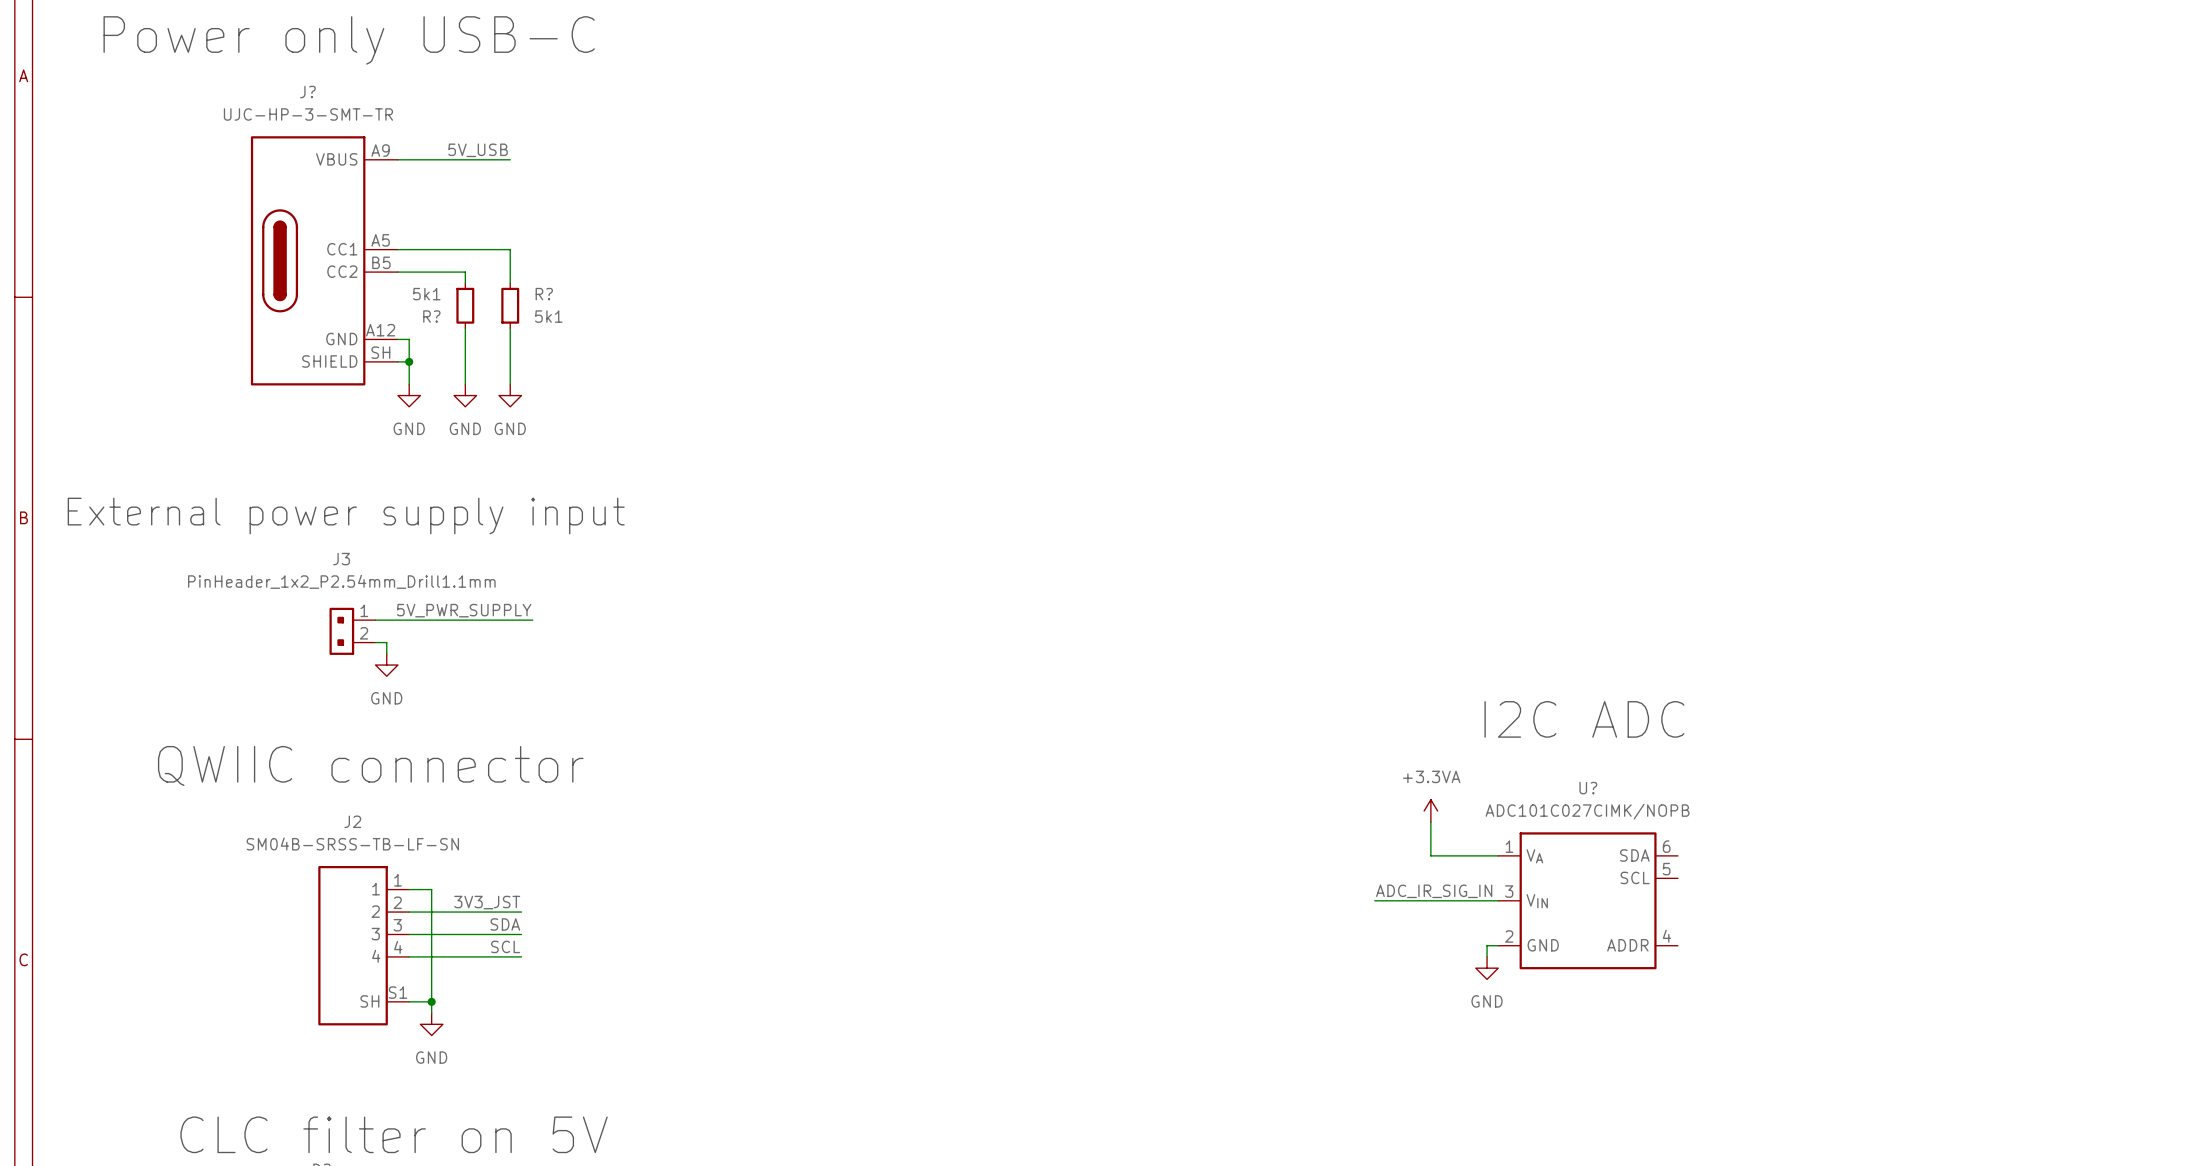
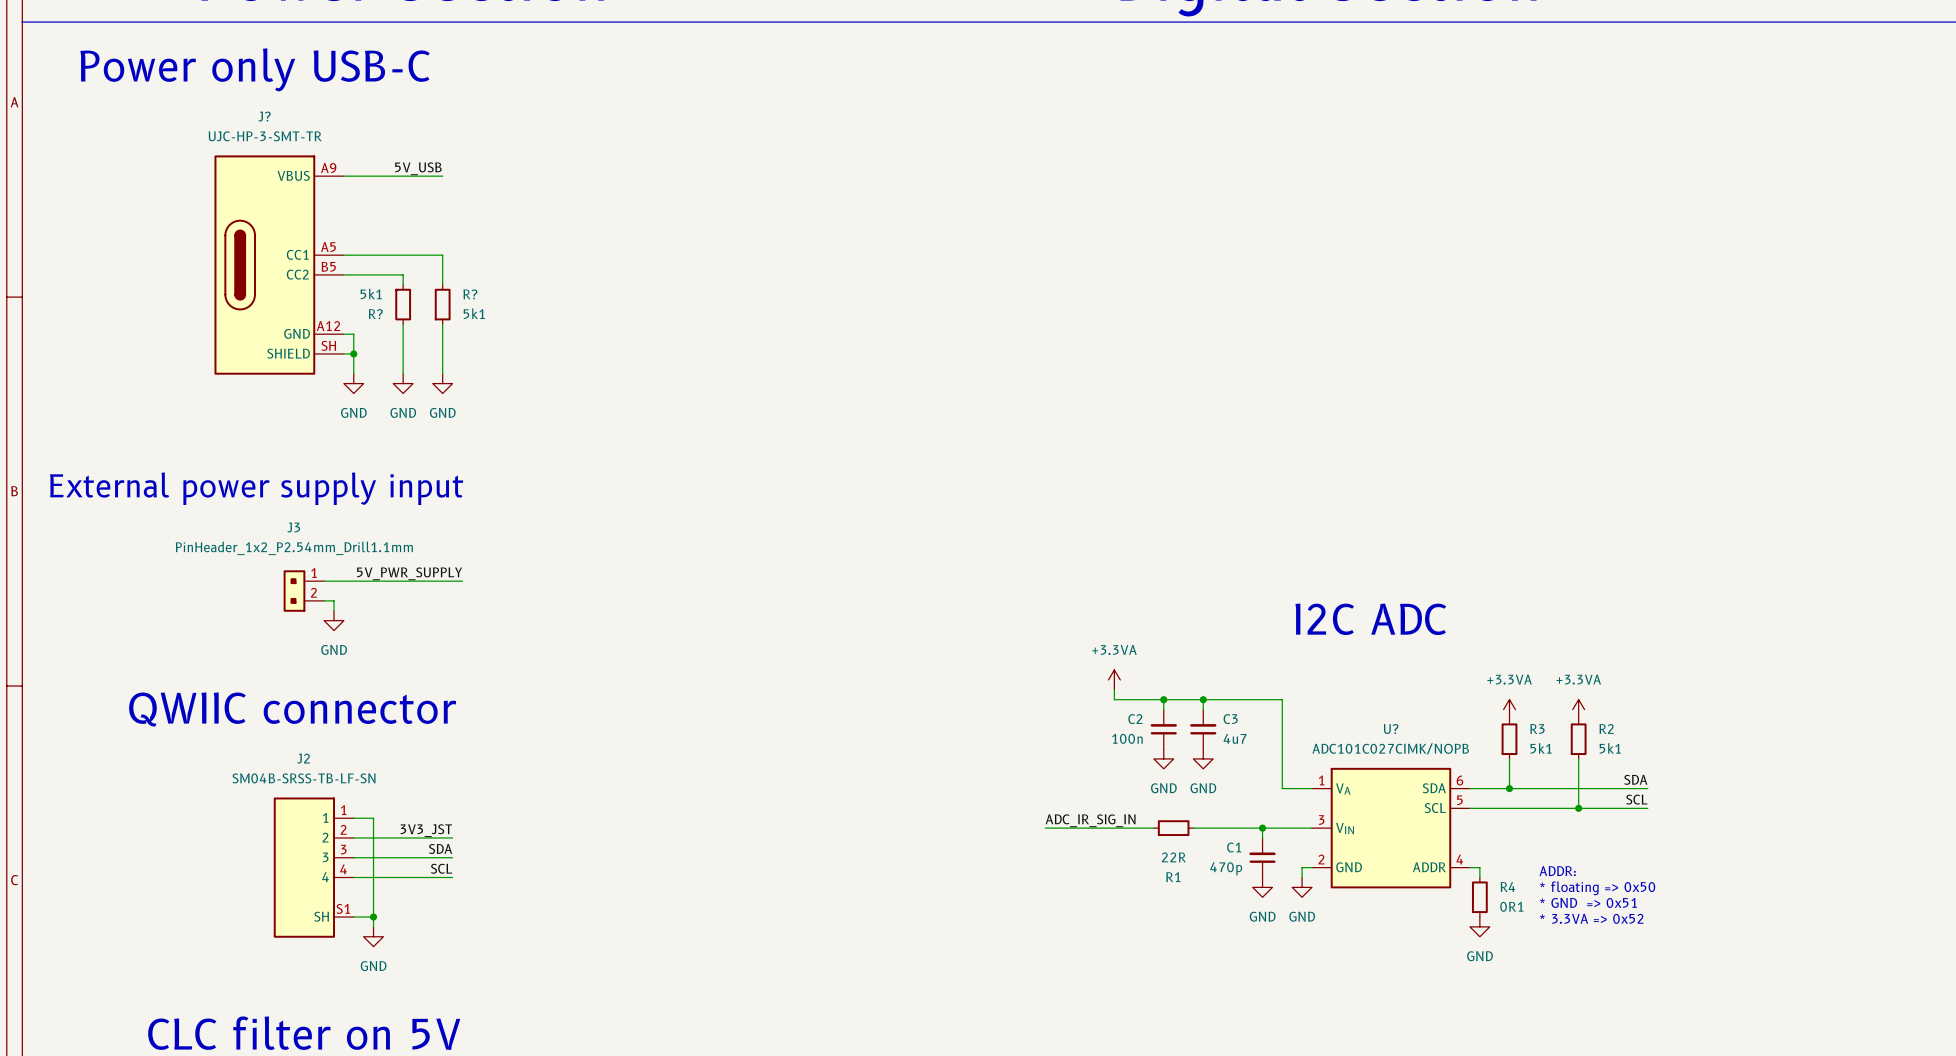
text position: I2C ADC (1584, 719) -> I2C ADC (1370, 619)
power symbol: none -> +3.3VA (1114, 679)
wire: none -> (1163, 699) (1163, 709)
junction: none -> (1163, 699)
wire: none -> (1203, 699) (1203, 709)
junction: none -> (1203, 699)
power symbol: none -> +3.3VA (1509, 709)
power symbol: none -> +3.3VA (1578, 709)
C2: none -> (1163, 729)
C3: none -> (1203, 729)
R3: none -> (1509, 739)
R2: none -> (1578, 739)
power symbol: +3.3VA (1430, 810) -> none
power symbol: none -> GND (1163, 758)
power symbol: none -> GND (1203, 758)
wire: (1430, 822) (1430, 855) (1464, 855) -> (1114, 689) (1114, 699) (1282, 699) (1282, 788)
wire: none -> (1509, 758) (1509, 788)
wire: none -> (1578, 758) (1578, 808)
label: none -> SDA (1635, 779)
wire: none -> (1469, 788) (1647, 788)
junction: none -> (1509, 788)
label: none -> SCL (1636, 799)
wire: none -> (1469, 808) (1647, 808)
junction: none -> (1578, 808)
label position: ADC_IR_SIG_IN (1434, 891) -> ADC_IR_SIG_IN (1090, 820)
wire: none -> (1045, 828) (1153, 828)
R1: none -> (1173, 828)
wire: none -> (1193, 828) (1203, 828)
wire: none -> (1262, 828) (1262, 837)
junction: none -> (1262, 828)
C1: none -> (1262, 857)
wire: none -> (1469, 867) (1479, 867) (1479, 877)
text: none -> ADDR: (1557, 871)
power symbol: none -> GND (1262, 887)
text: none -> * floating => 0x50 (1597, 888)
R4: none -> (1479, 897)
text: none -> * GND => 0x51 (1588, 902)
text: none -> * 3.3VA => 0x52 (1591, 918)
power symbol: none -> GND (1479, 926)

